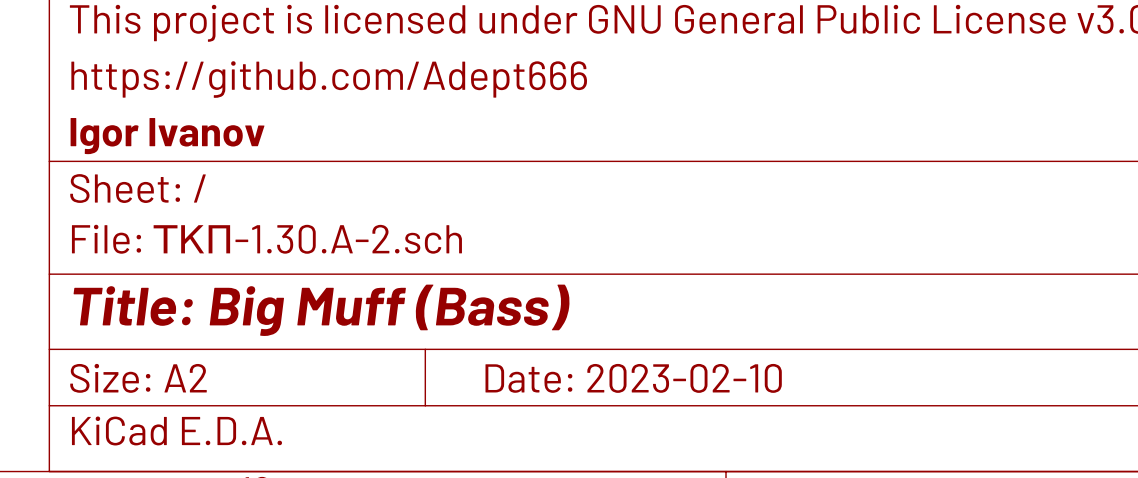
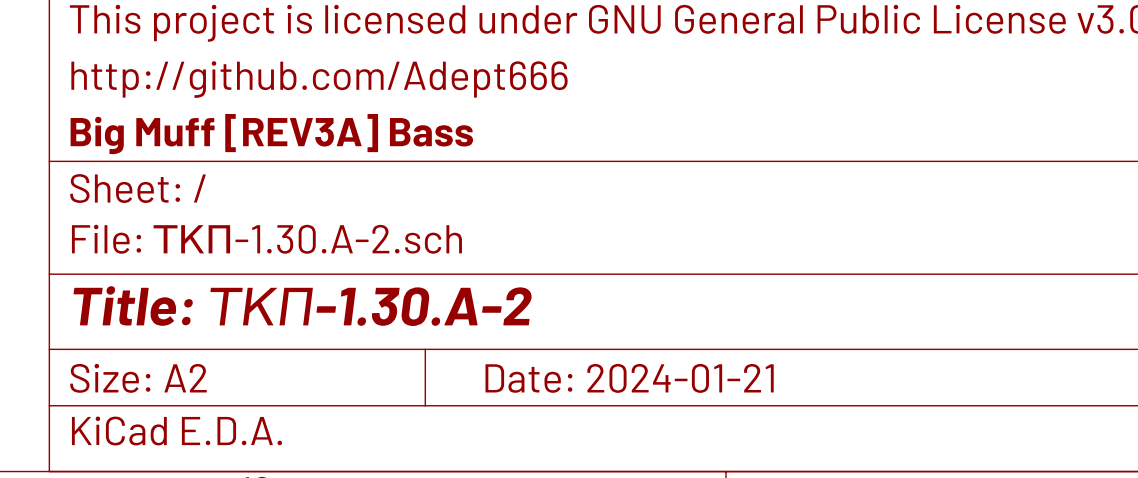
title block: https://github.com/Adept666 (329, 79) -> http://github.com/Adept666 (319, 79)
title block: Igor Ivanov (167, 136) -> Big Muff [REV3A] Bass (271, 134)
title block: Title: Big Muff (Bass) (321, 310) -> Title: ТКП-1.30.A-2 (302, 306)
title block: Date: 2023-02-10 (633, 378) -> Date: 2024-01-21 (629, 378)

